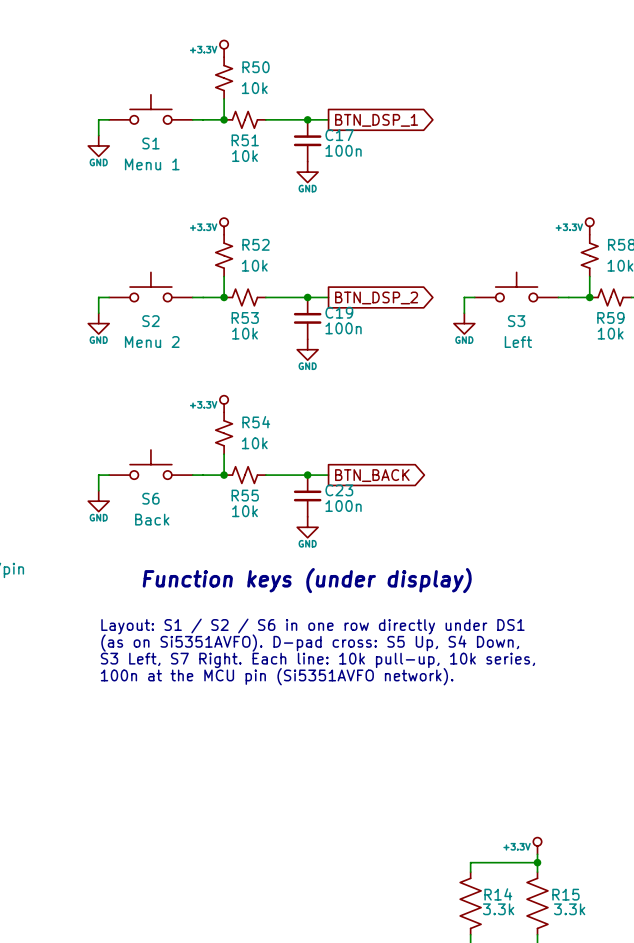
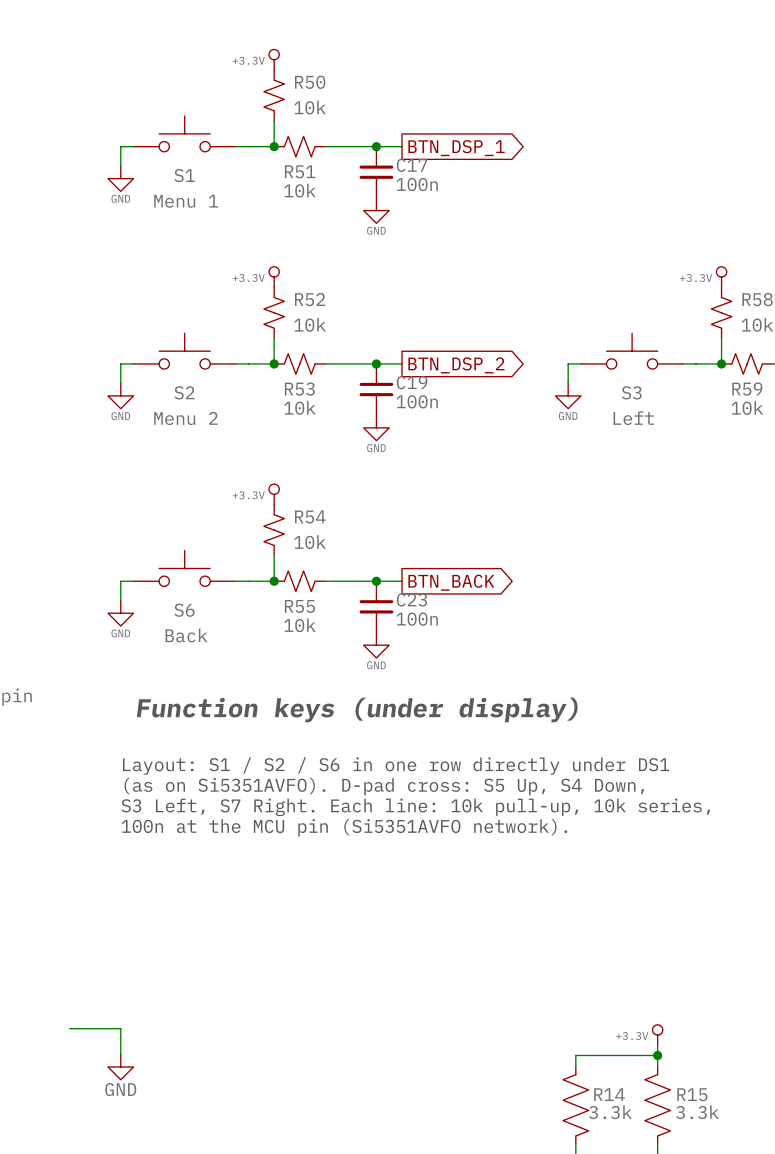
wire: none -> (69, 1028) (120, 1028) (120, 1054)
power symbol: none -> GND (120, 1066)

